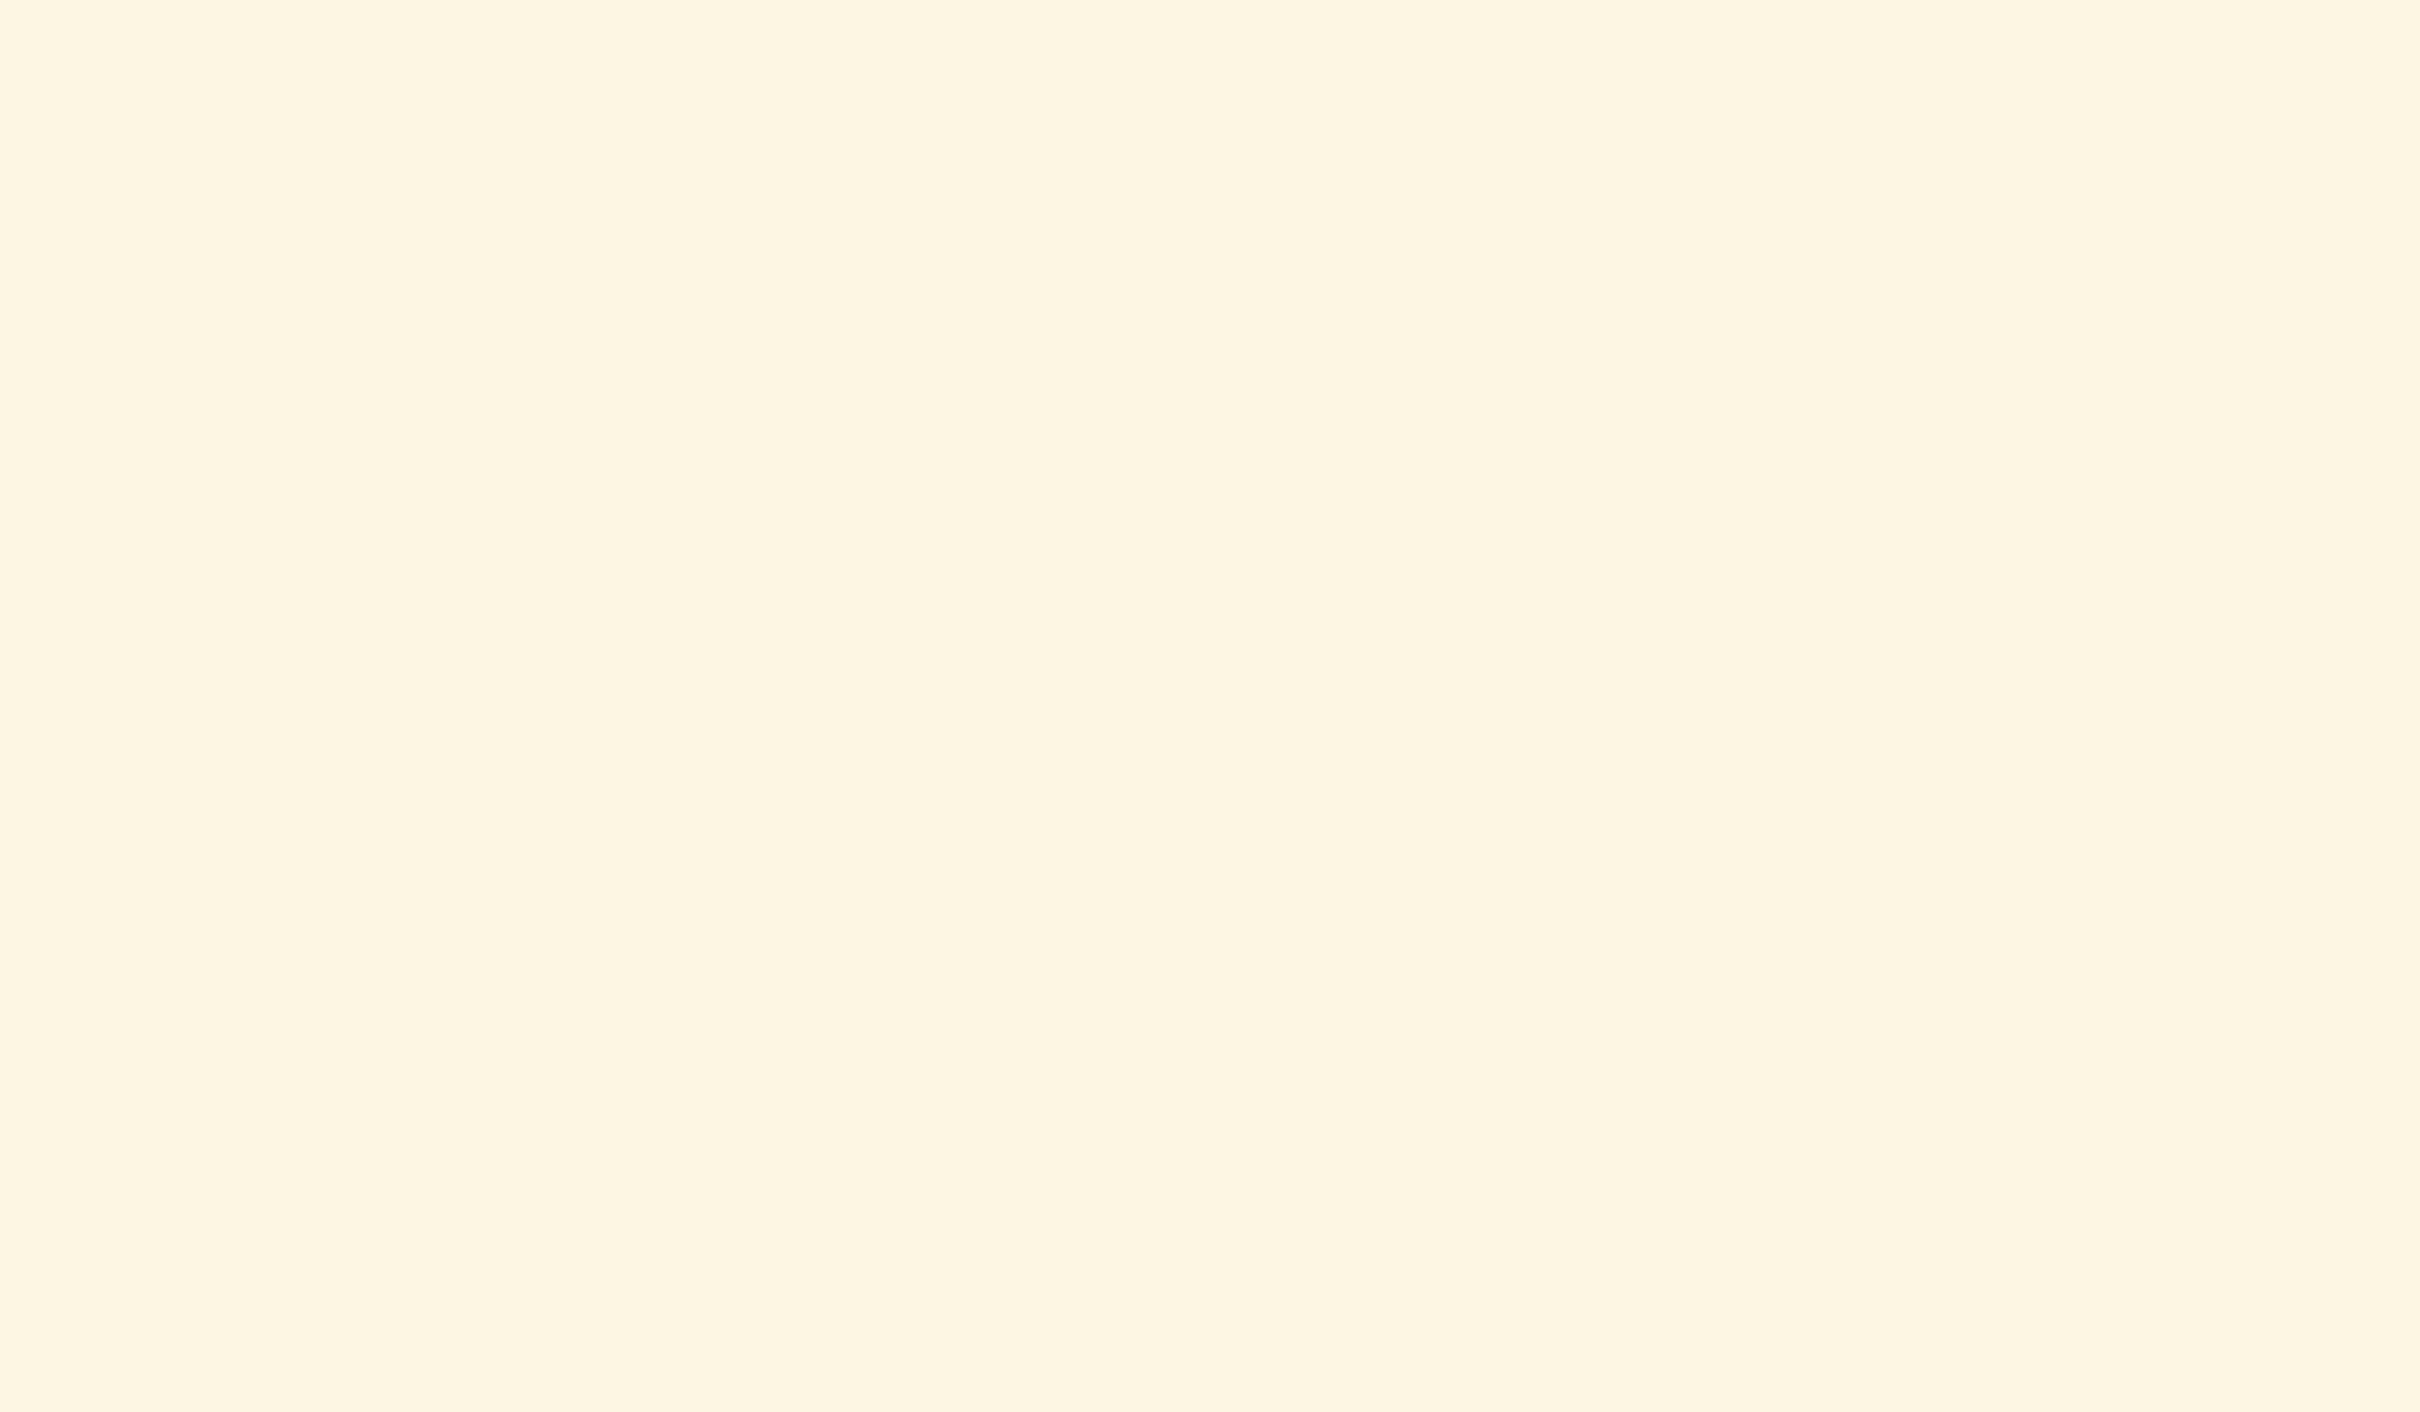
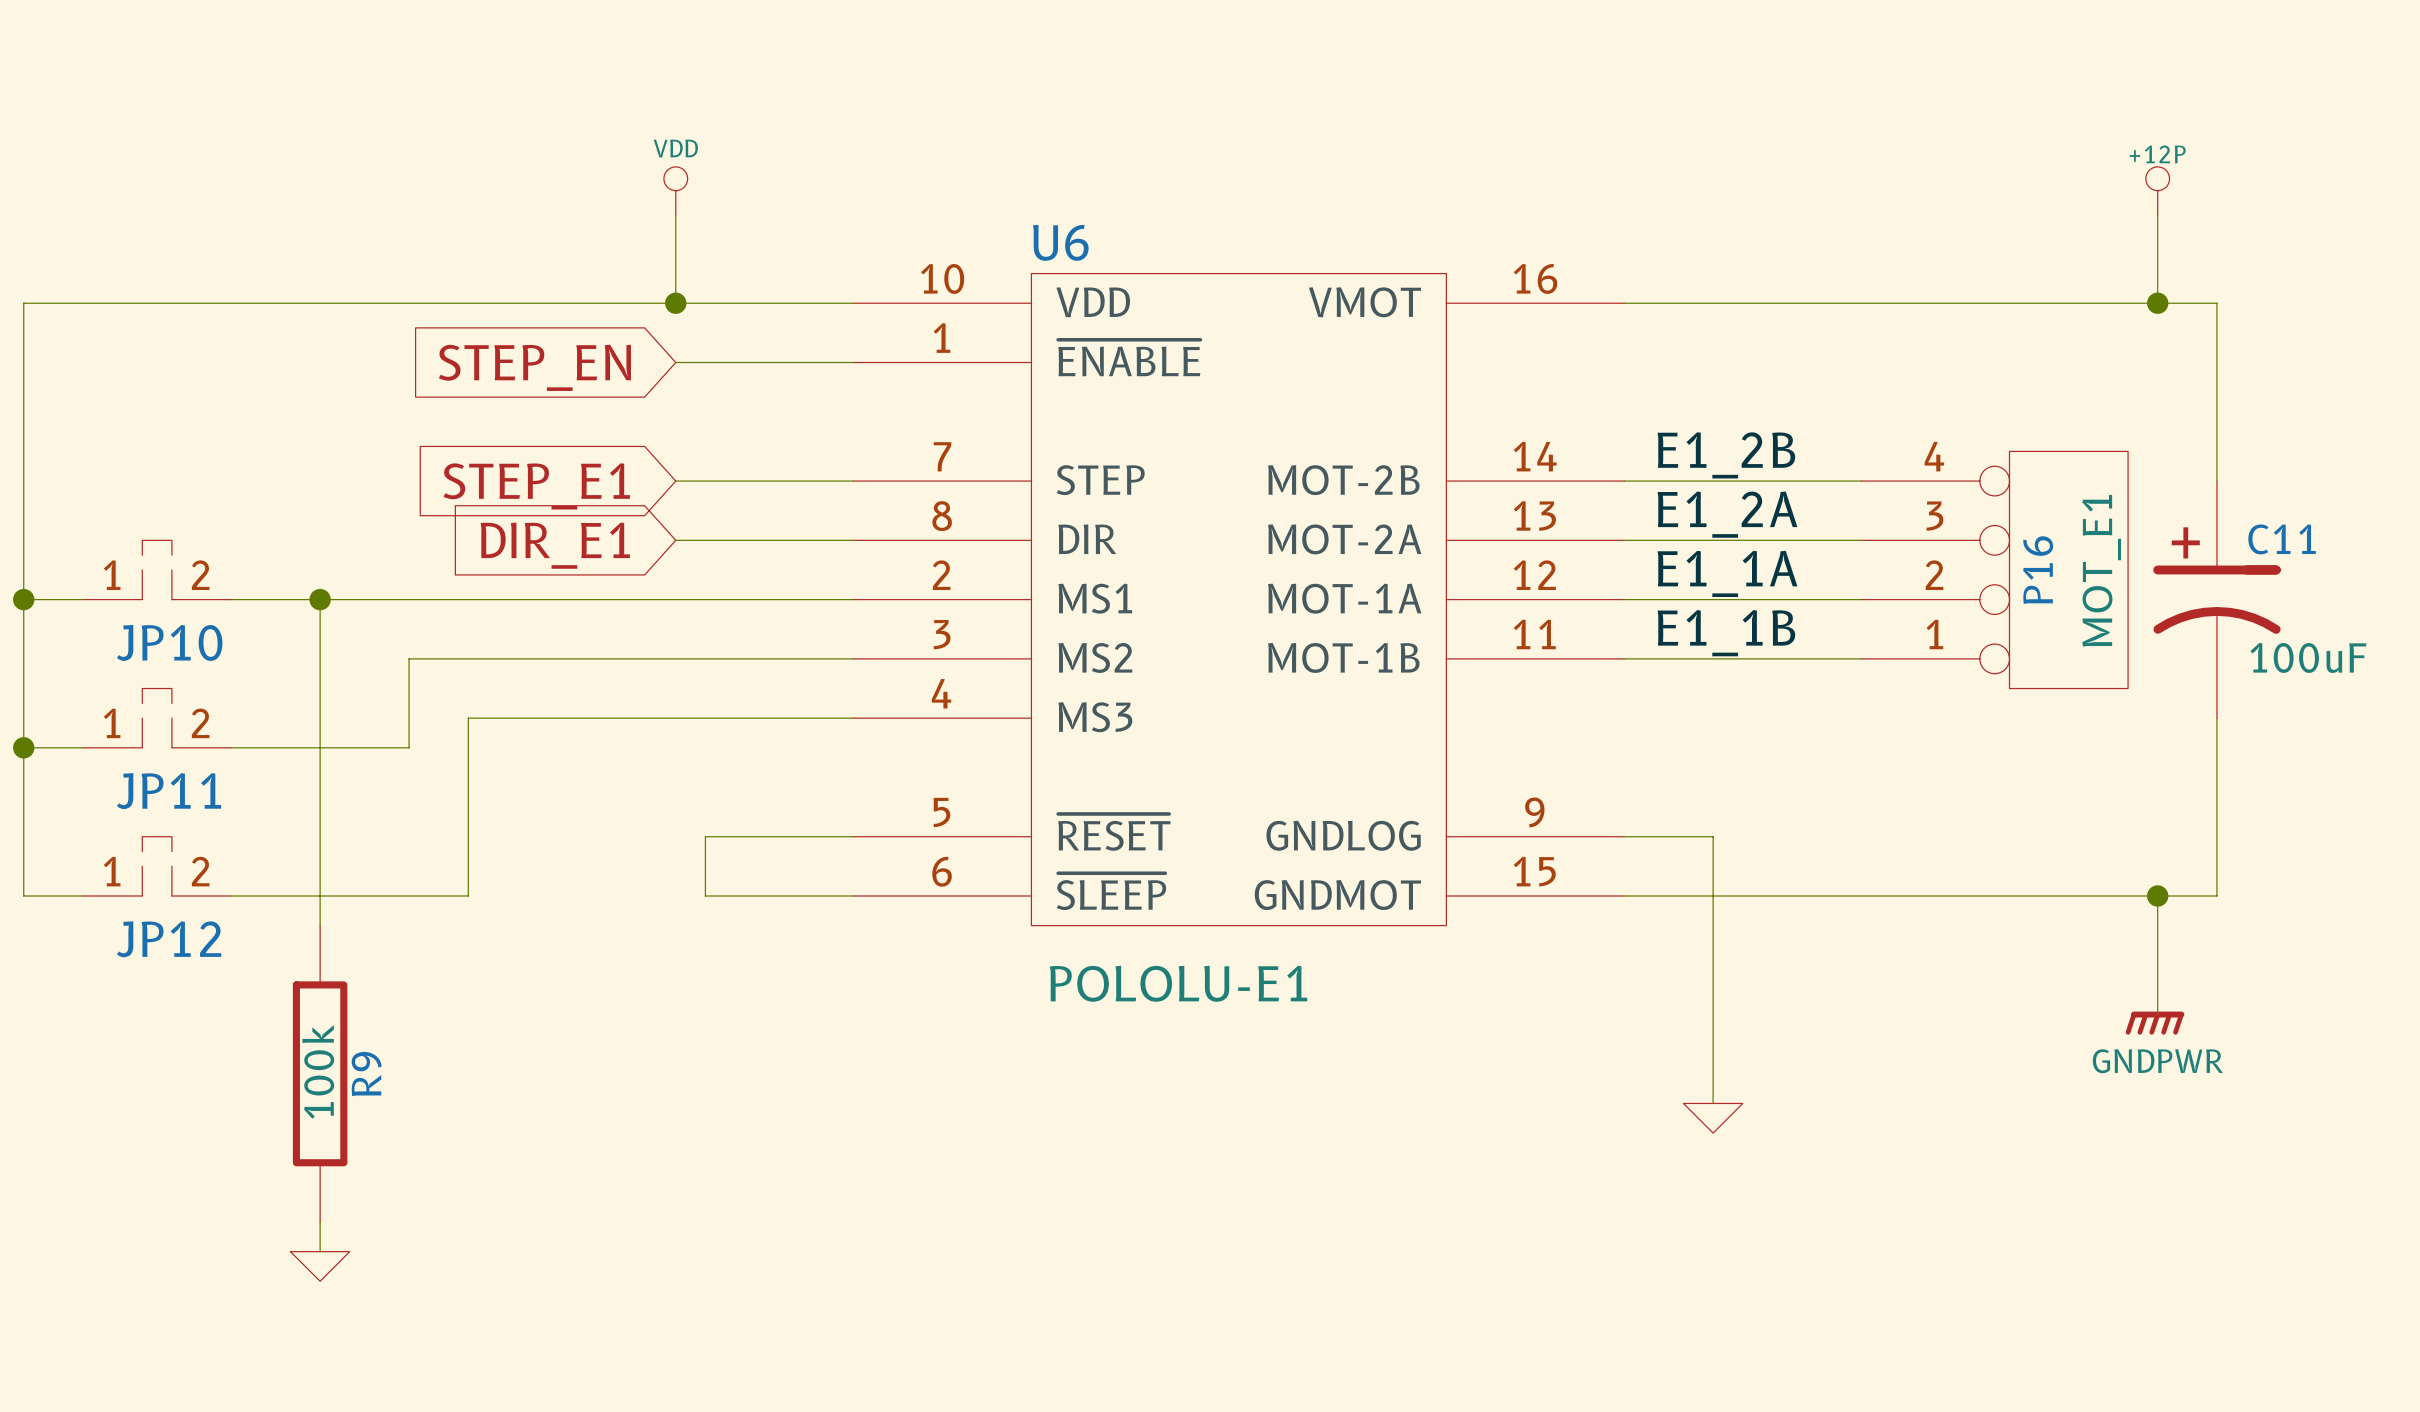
power symbol: none -> VDD (675, 190)
power symbol: none -> +12P (2157, 190)
wire: none -> (675, 214) (675, 303)
wire: none -> (2157, 214) (2157, 303)
junction: none -> (675, 303)
wire: none -> (853, 303) (23, 303) (23, 895) (83, 895)
wire: none -> (1624, 303) (2216, 303) (2216, 481)
junction: none -> (2157, 303)
wire: none -> (675, 362) (853, 362)
global label: none -> STEP_EN (534, 367)
label: none -> E1_2B (1726, 455)
wire: none -> (675, 481) (853, 481)
wire: none -> (1624, 481) (1861, 481)
global label: none -> STEP_E1 (536, 486)
label: none -> E1_2A (1727, 514)
wire: none -> (675, 540) (853, 540)
wire: none -> (1624, 540) (1861, 540)
global label: none -> DIR_E1 (555, 545)
JP10: none -> (157, 569)
P16: none -> MOT_E1 (1994, 569)
label: none -> E1_1A (1727, 573)
wire: none -> (23, 599) (83, 599)
junction: none -> (23, 599)
wire: none -> (231, 599) (853, 599)
wire: none -> (320, 599) (320, 925)
junction: none -> (320, 599)
U6: none -> POLOLU-E1 (1238, 599)
wire: none -> (1624, 599) (1861, 599)
C11: none -> 100uF (2216, 599)
label: none -> E1_1B (1726, 633)
wire: none -> (853, 658) (409, 658) (409, 747) (231, 747)
wire: none -> (1624, 658) (1861, 658)
JP11: none -> (157, 718)
wire: none -> (853, 718) (468, 718) (468, 895) (231, 895)
wire: none -> (2216, 718) (2216, 895) (1624, 895)
wire: none -> (23, 747) (83, 747)
junction: none -> (23, 747)
wire: none -> (853, 836) (705, 836) (705, 895) (853, 895)
wire: none -> (1624, 836) (1713, 836) (1713, 1103)
JP12: none -> (157, 866)
wire: none -> (2157, 895) (2157, 1014)
junction: none -> (2157, 895)
power symbol: none -> GNDPWR (2155, 1023)
R9: none -> 100k (320, 1073)
power symbol: none -> (1713, 1118)
wire: none -> (320, 1222) (320, 1251)
power symbol: none -> (320, 1266)

